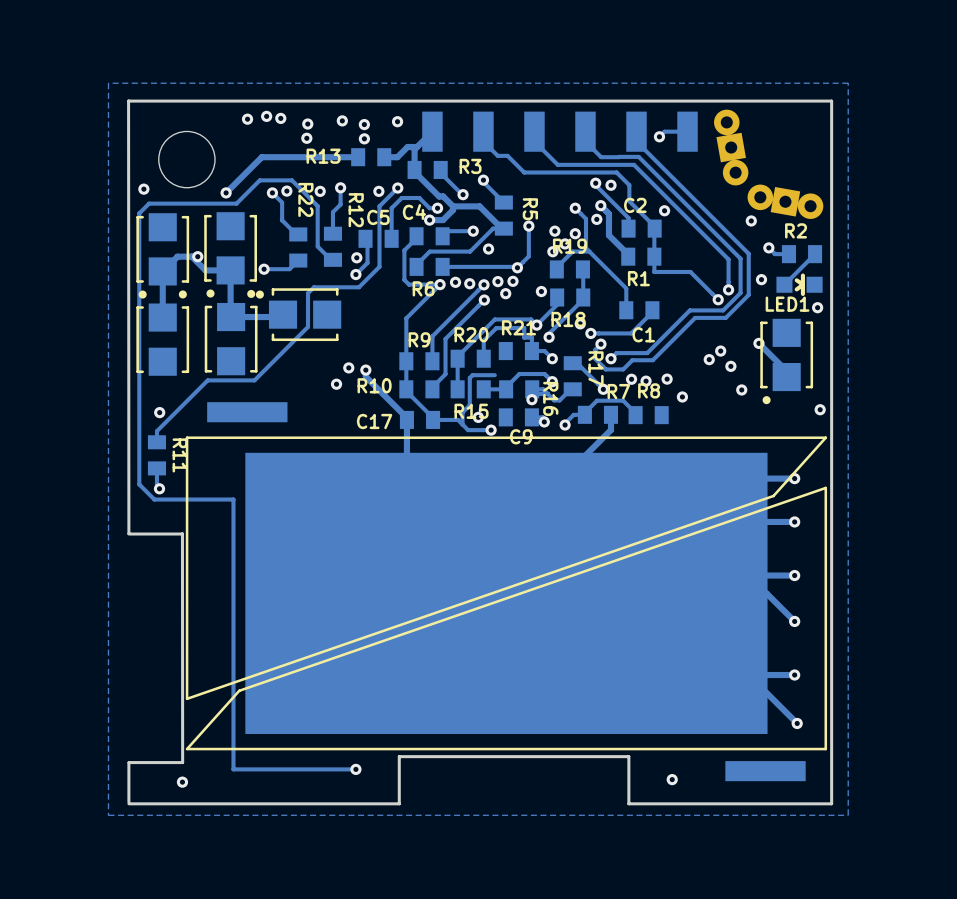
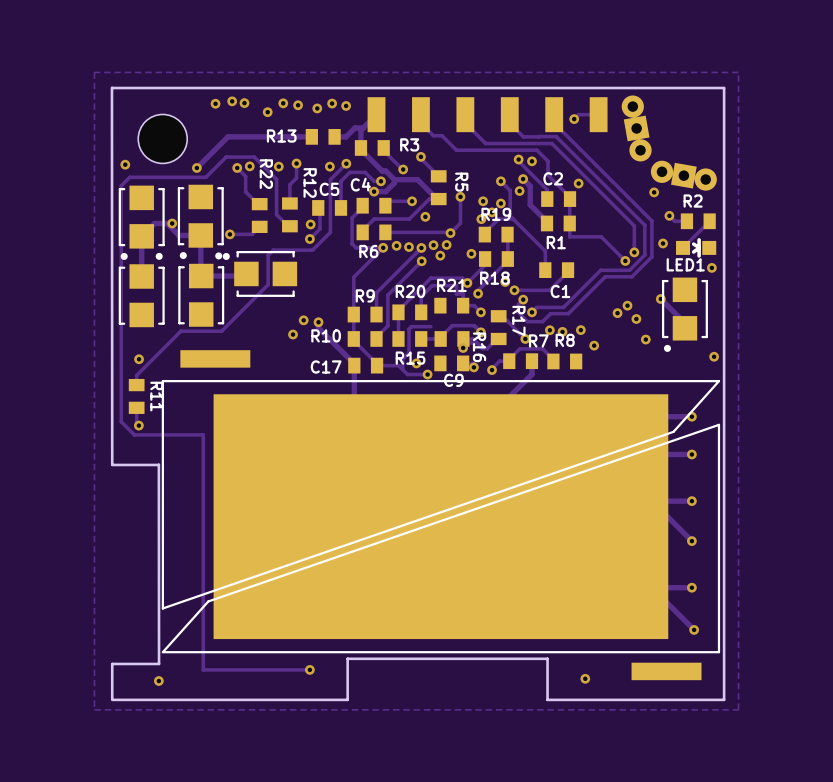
via: none -> (283, 103)
via: none -> (332, 103)
via: (307, 124) -> none
via: none -> (267, 112)
via: (306, 138) -> none
via: (364, 138) -> none

